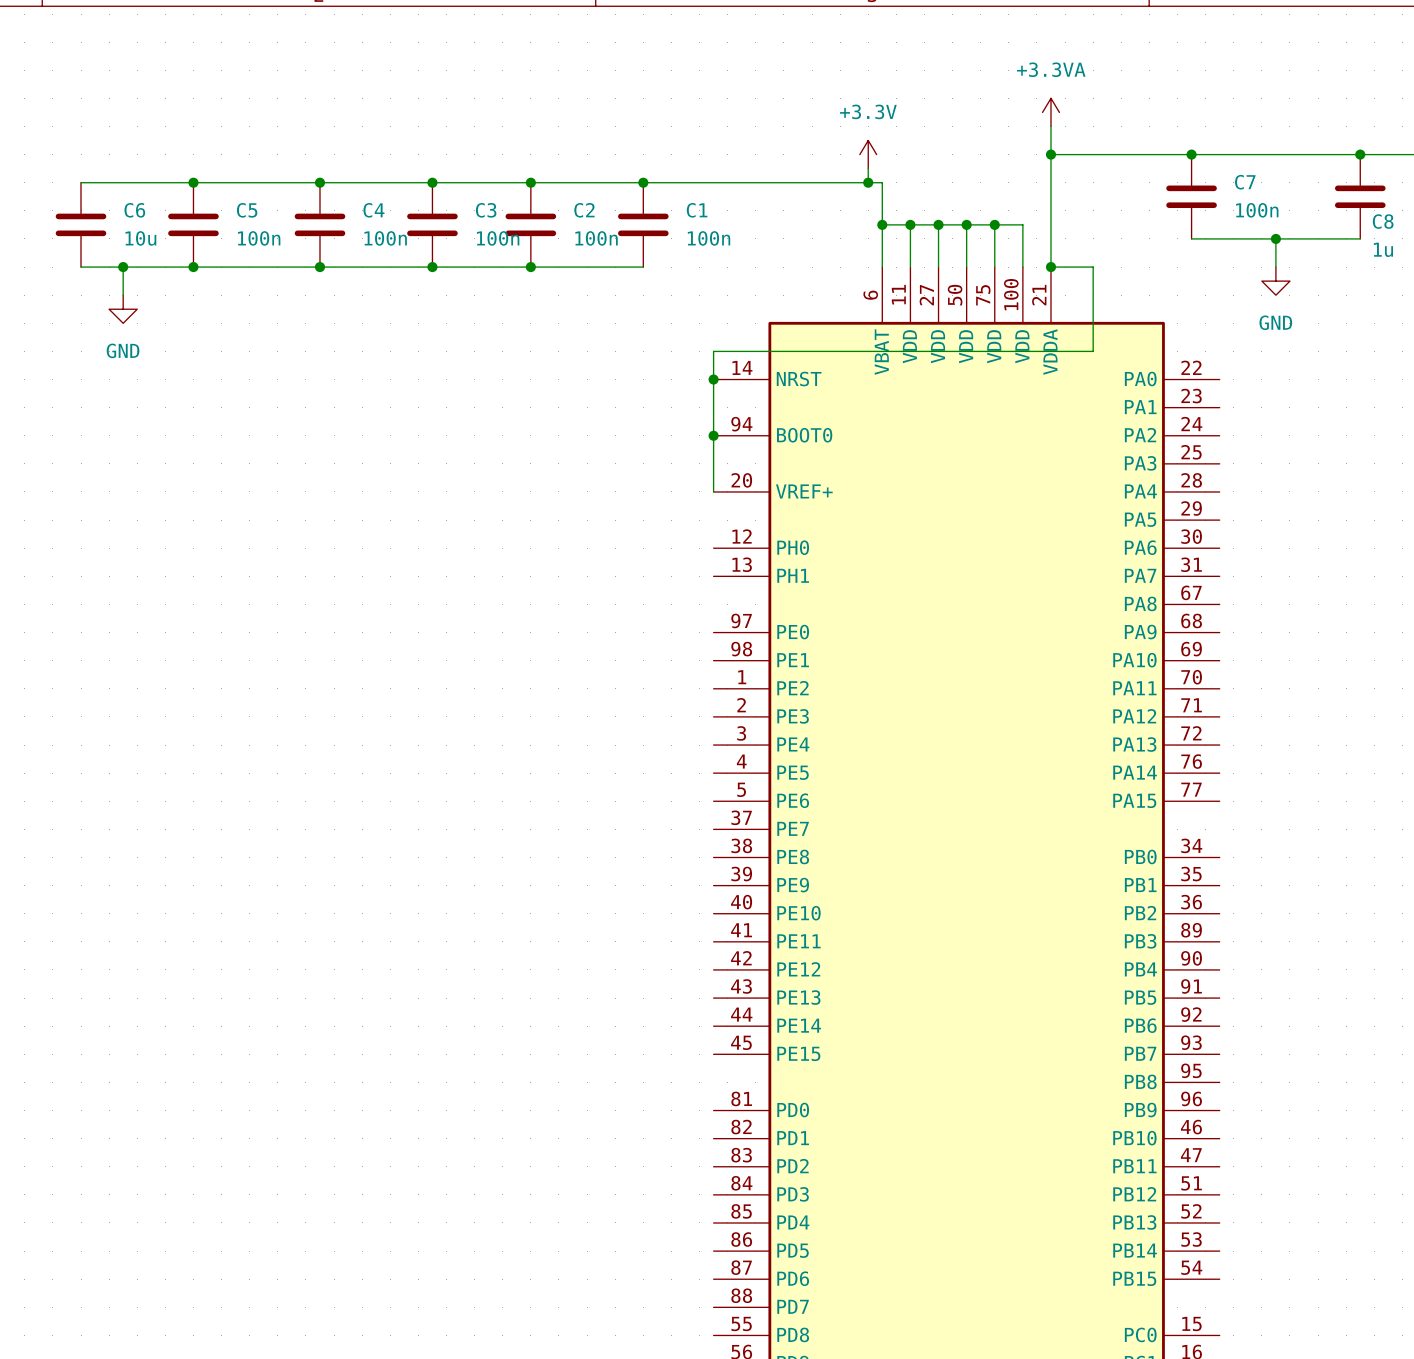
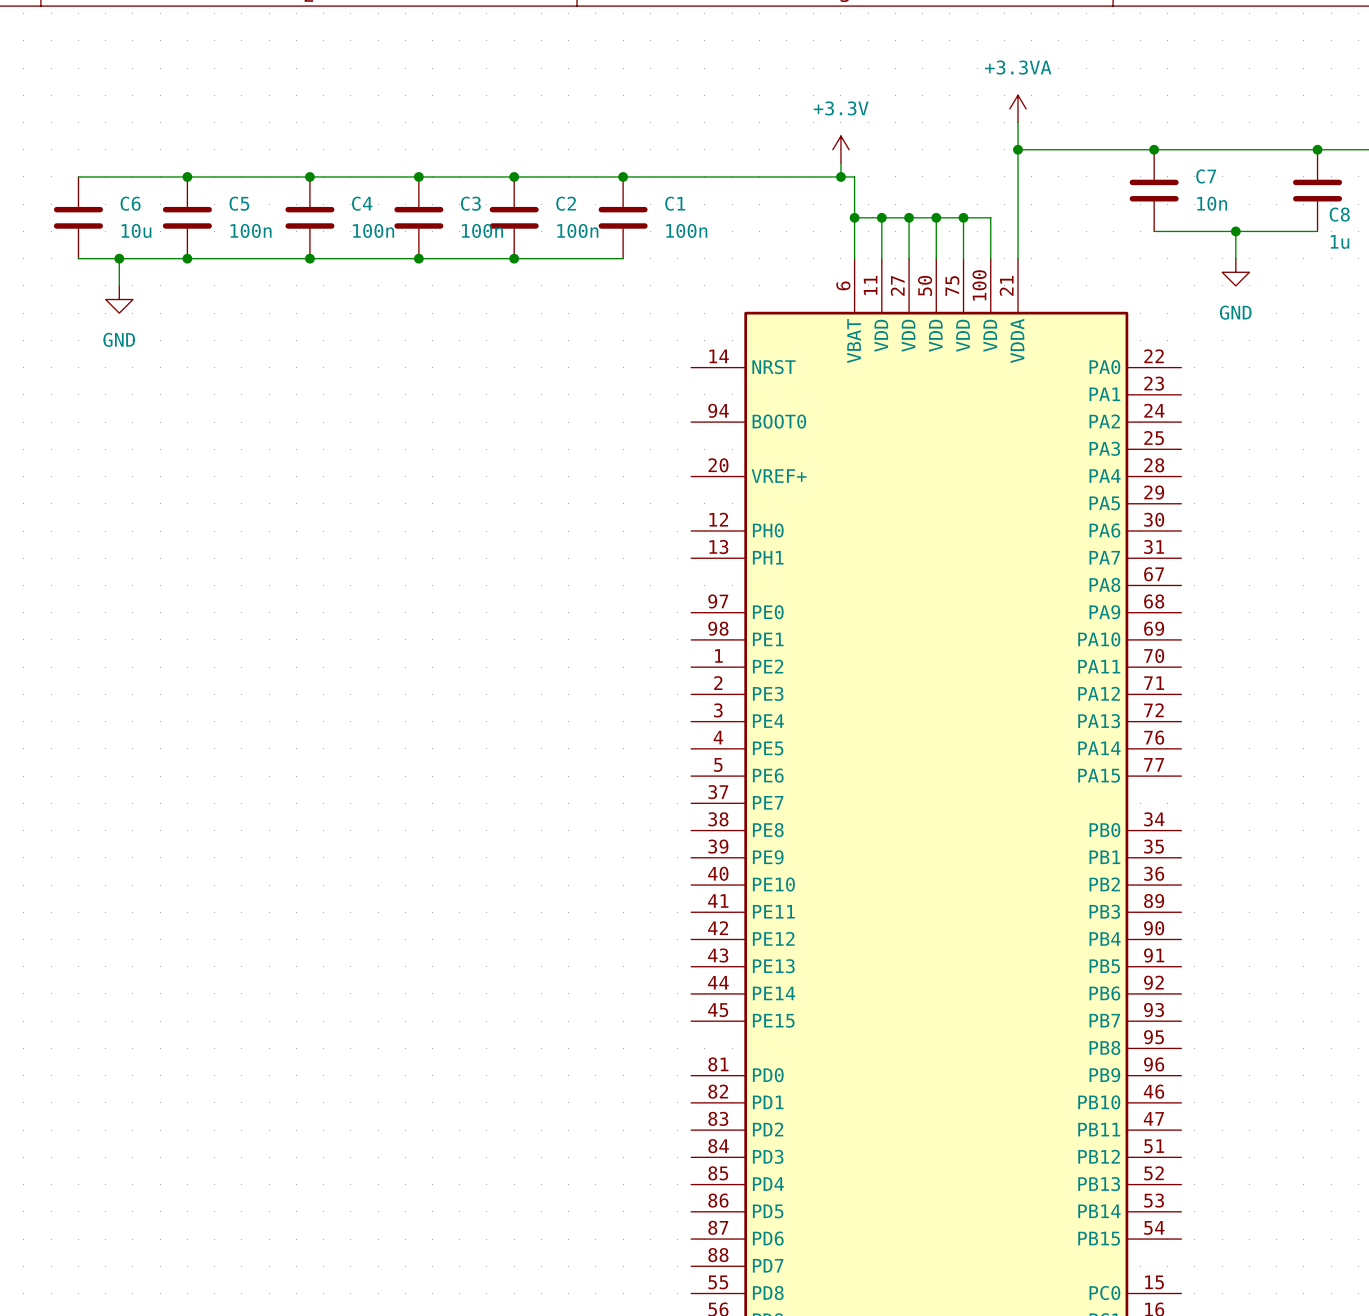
C7 value: 100n (1257, 210) -> 10n (1212, 203)
wire: (1050, 267) (1093, 267) (1093, 351) (713, 351) (713, 491) -> none
junction: (1050, 267) -> none
junction: (713, 379) -> none
junction: (713, 435) -> none

